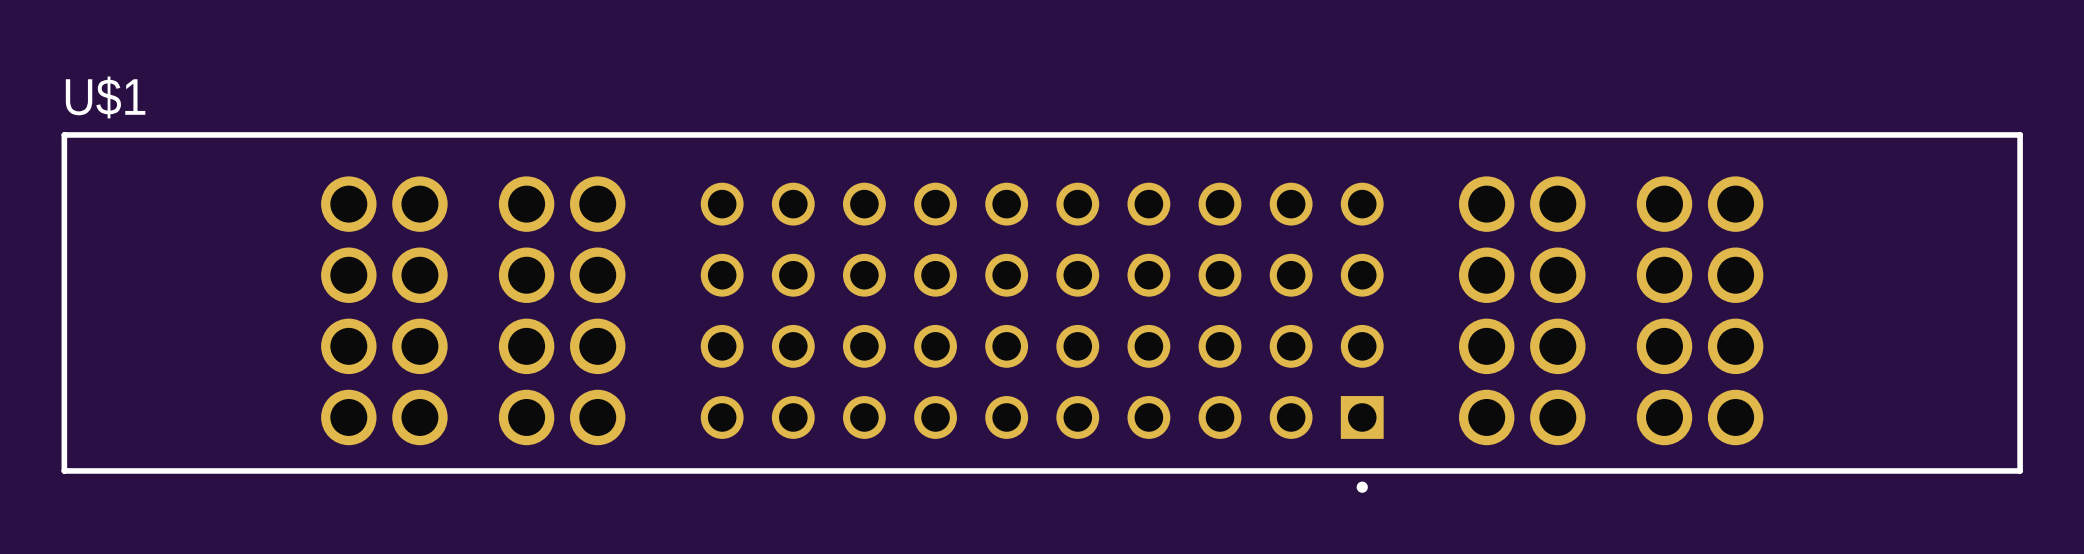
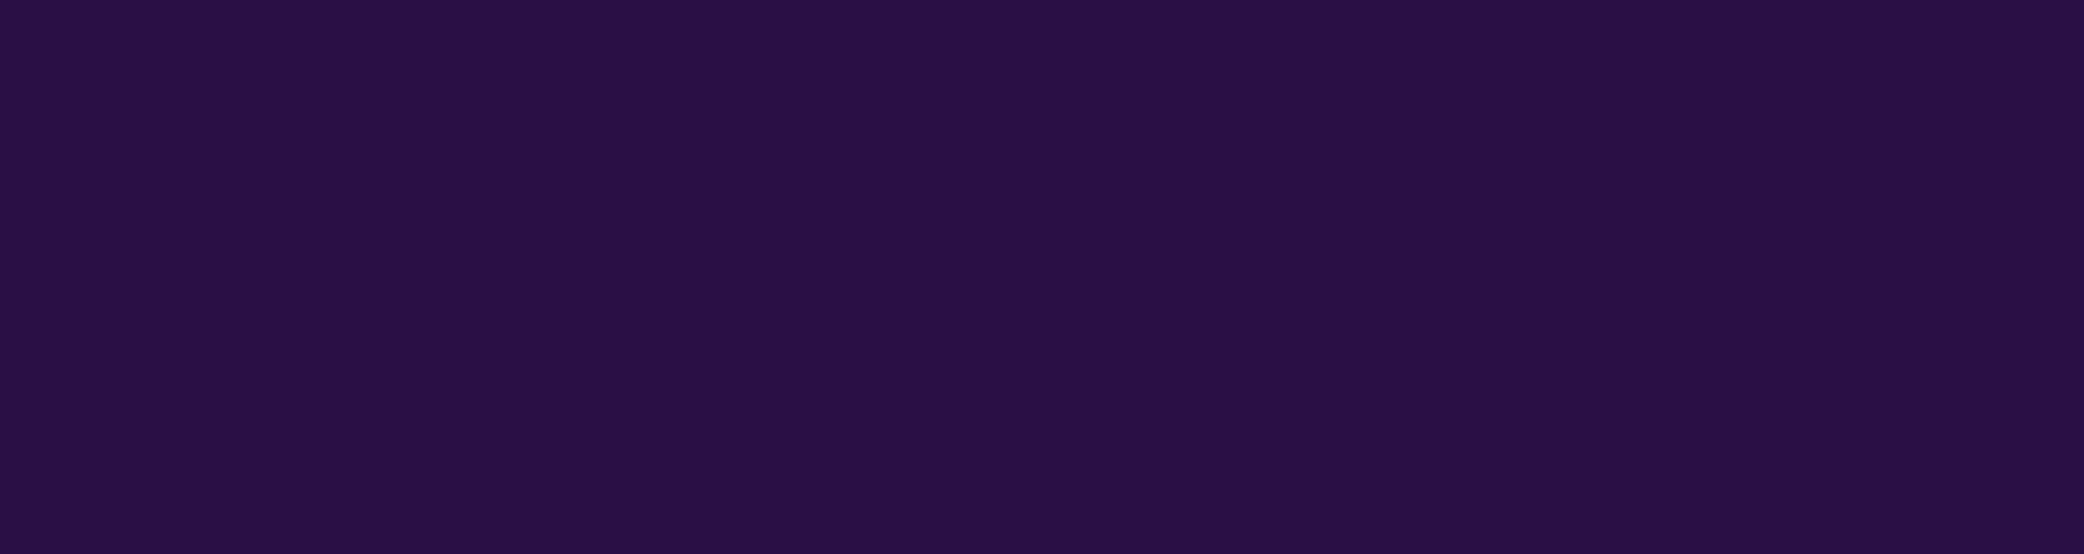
U$1: (1042, 312) -> none

